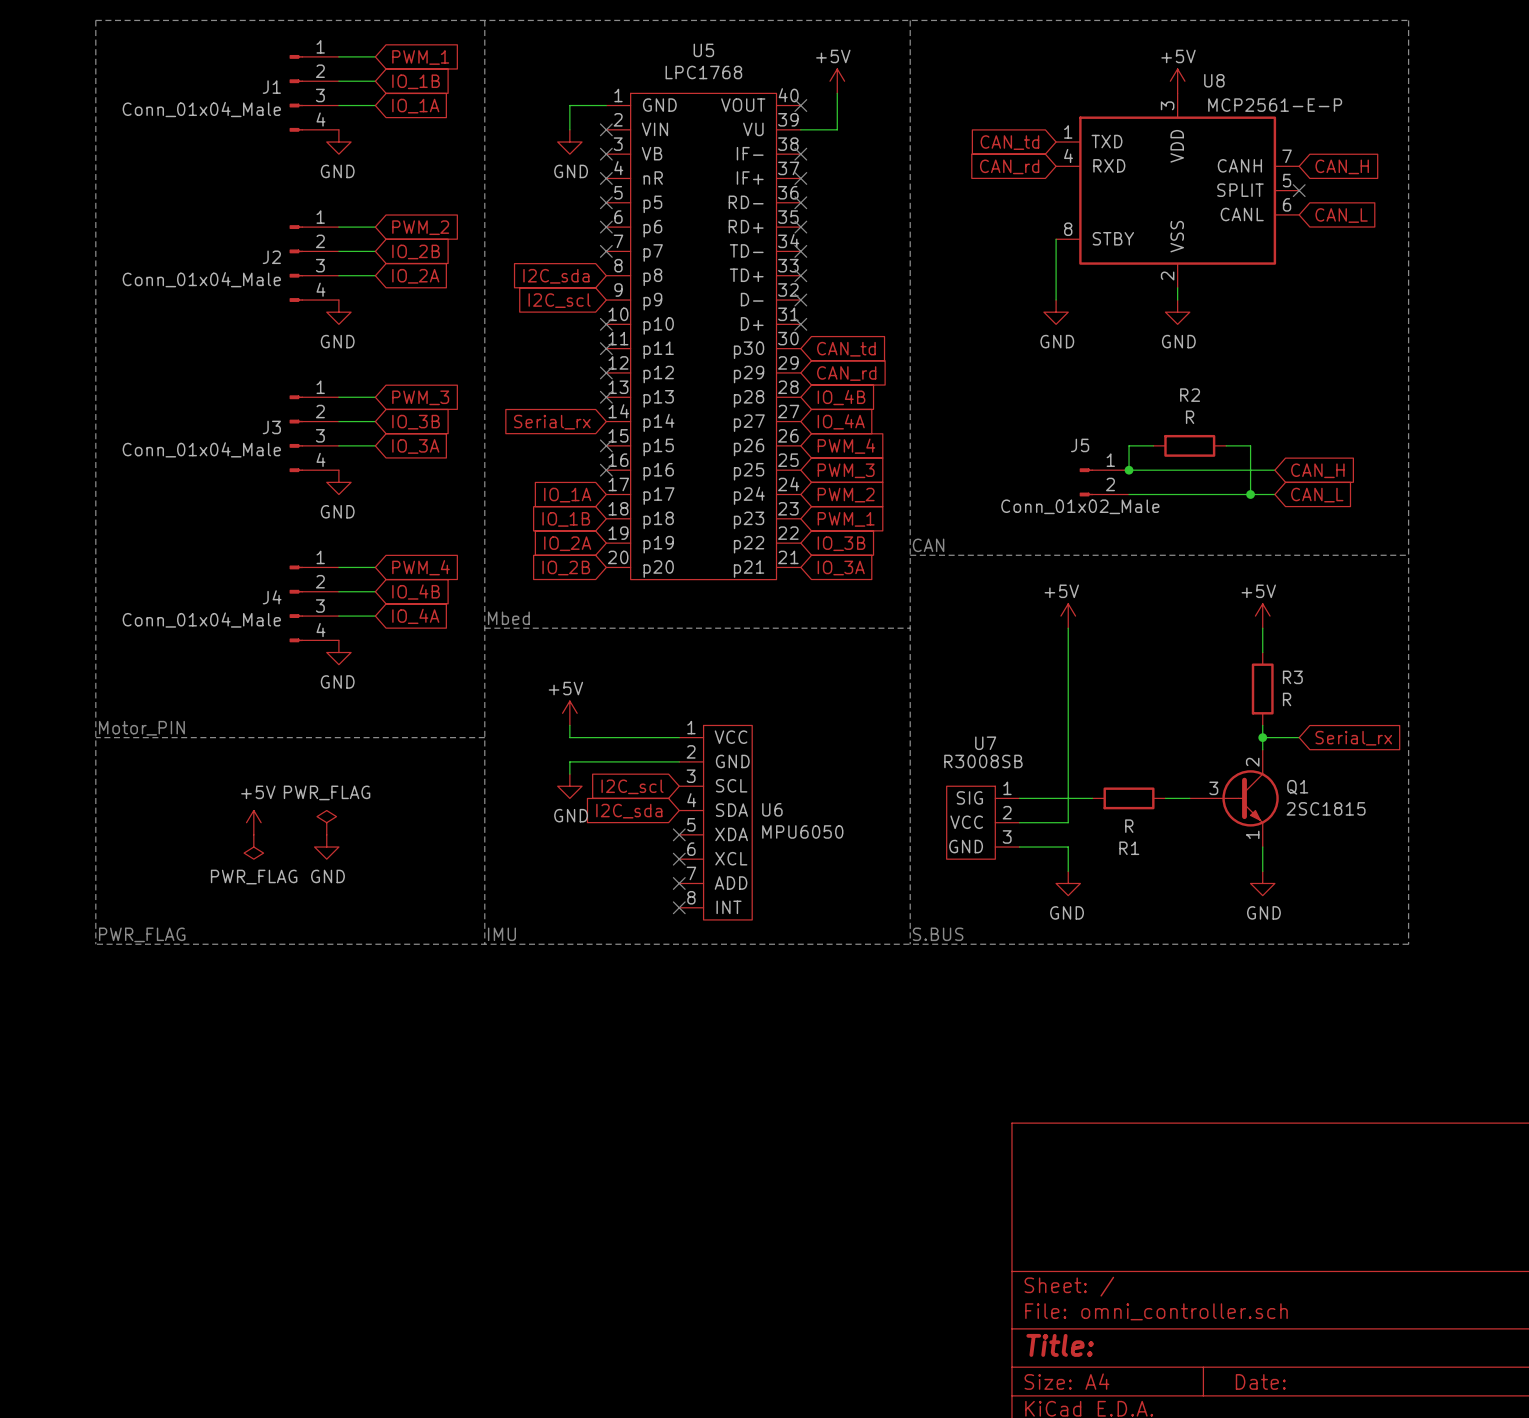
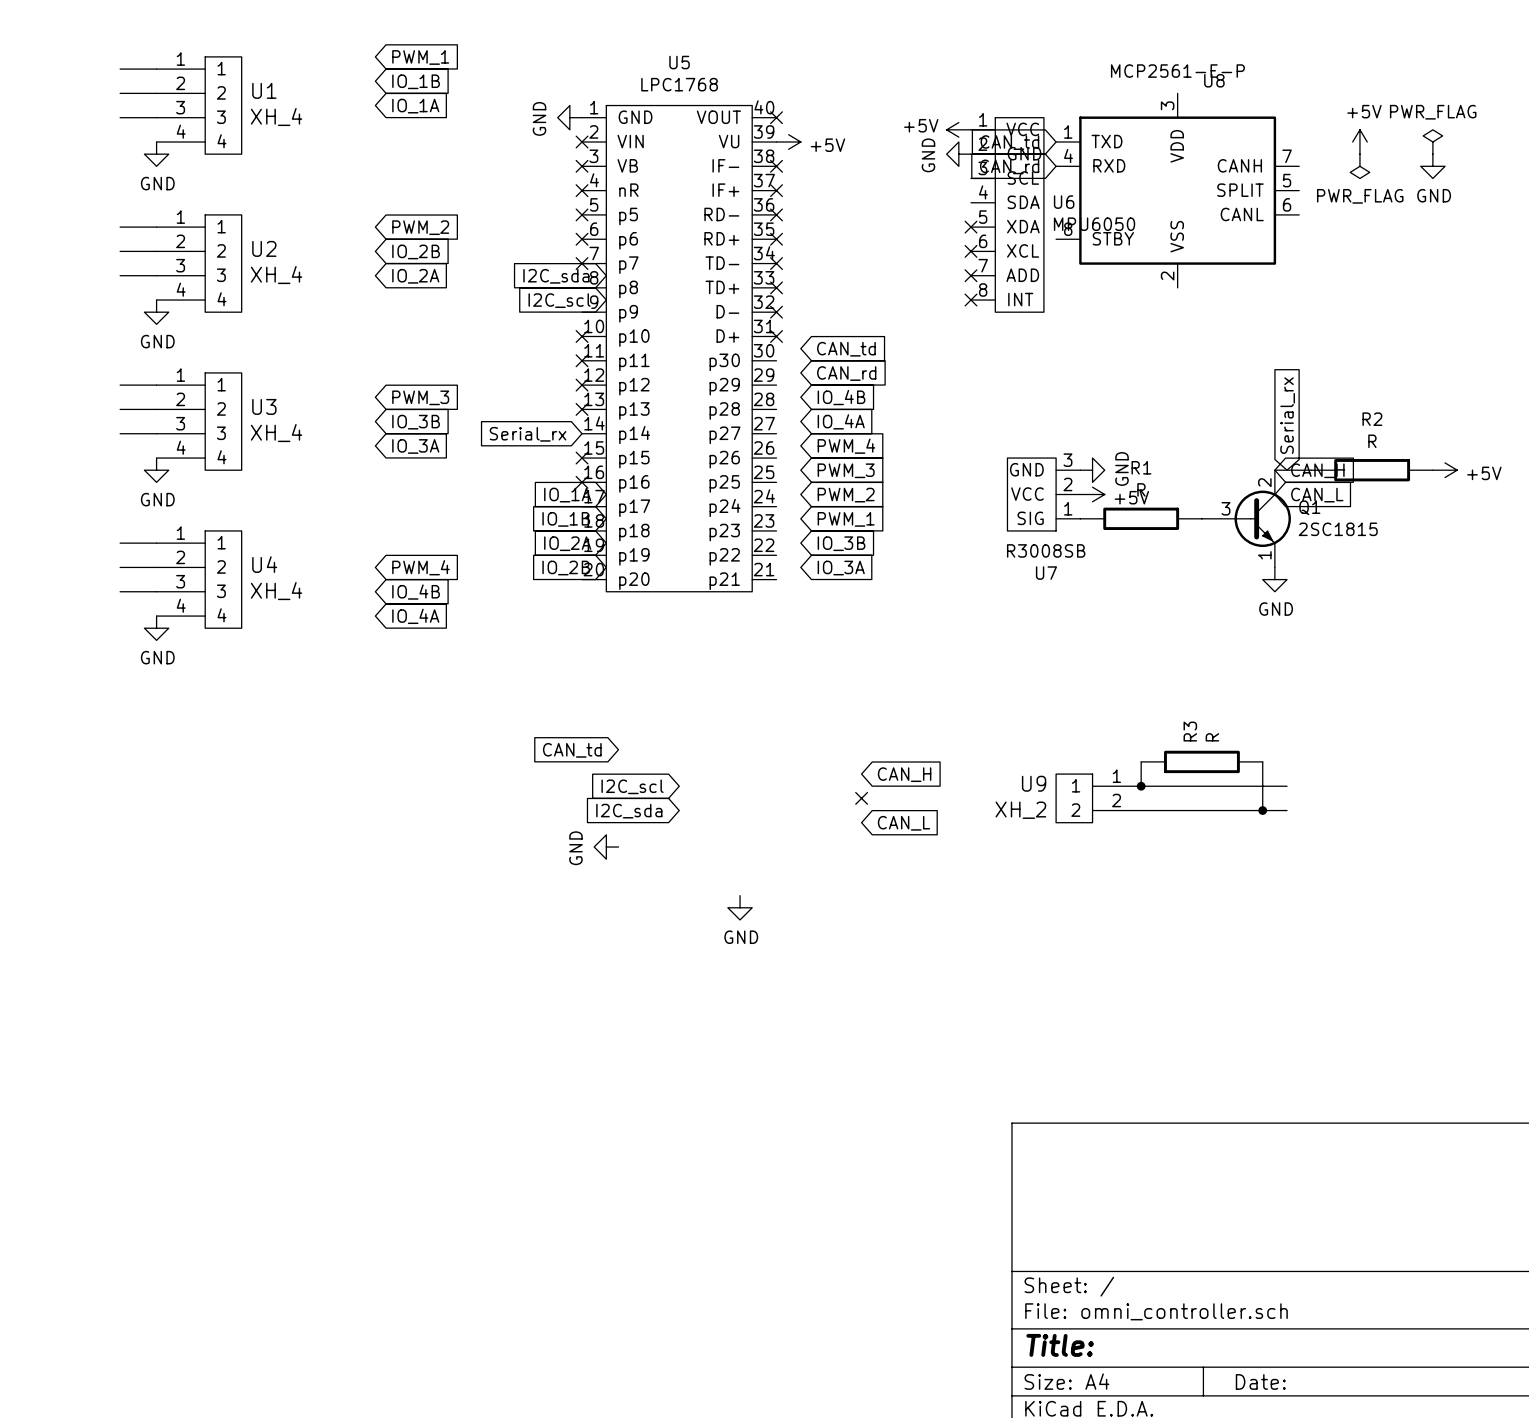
line: (95, 20) (1408, 20) (1408, 944) (95, 944) (95, 20) -> none
line: (484, 20) (484, 944) -> none
line: (910, 20) (910, 944) -> none
wire: (338, 56) (375, 56) -> (120, 69) (156, 69)
wire: (338, 81) (375, 81) -> (120, 93) (156, 93)
power symbol: +5V (837, 81) -> none
power symbol: +5V (1177, 81) -> none
J1: Conn_01x04_Male (314, 93) -> none
wire: (837, 93) (837, 129) (800, 129) -> none
U1: none -> XH_4 (199, 105)
wire: (338, 105) (375, 105) -> (120, 117) (156, 117)
wire: (606, 105) (569, 105) (569, 129) -> none
no-connect mark: (800, 105) -> none
U8 value position: MCP2561-E-P (1275, 105) -> MCP2561-E-P (1177, 71)
no-connect mark: none -> (776, 117)
no-connect mark: (606, 129) -> none
power symbol: none -> +5V (958, 129)
power symbol: GND (338, 142) -> none
power symbol rotation: 0° (569, 142) -> 90° clockwise (569, 117)
power symbol position: GND (569, 142) -> GND (569, 117)
no-connect mark: none -> (582, 142)
power symbol: none -> +5V (788, 142)
power symbol: none -> +5V (1359, 142)
power symbol: none -> PWR_FLAG (1432, 142)
power symbol: none -> GND (156, 154)
no-connect mark: (606, 154) -> none
no-connect mark: (800, 154) -> none
power symbol: none -> GND (958, 154)
no-connect mark: none -> (582, 166)
no-connect mark: none -> (776, 166)
global label: CAN_H (1342, 166) -> none
power symbol: none -> PWR_FLAG (1359, 166)
power symbol: none -> GND (1432, 166)
no-connect mark: (606, 178) -> none
no-connect mark: (800, 178) -> none
no-connect mark: none -> (582, 190)
no-connect mark: none -> (776, 190)
no-connect mark: (1299, 190) -> none
no-connect mark: (606, 202) -> none
no-connect mark: (800, 202) -> none
no-connect mark: none -> (582, 214)
no-connect mark: none -> (776, 214)
global label: CAN_L (1341, 215) -> none
wire: (338, 227) (375, 227) -> (120, 227) (156, 227)
no-connect mark: (606, 227) -> none
no-connect mark: (800, 227) -> none
no-connect mark: none -> (971, 227)
no-connect mark: none -> (582, 239)
no-connect mark: none -> (776, 239)
wire: (1056, 239) (1056, 300) -> none
wire: (338, 251) (375, 251) -> (120, 251) (156, 251)
no-connect mark: (606, 251) -> none
no-connect mark: (800, 251) -> none
no-connect mark: none -> (971, 251)
U2: none -> XH_4 (199, 263)
J2: Conn_01x04_Male (314, 263) -> none
no-connect mark: none -> (582, 263)
no-connect mark: none -> (776, 263)
wire: (338, 275) (375, 275) -> (120, 275) (156, 275)
no-connect mark: (800, 275) -> none
no-connect mark: none -> (971, 275)
no-connect mark: none -> (776, 287)
wire: (1177, 287) (1177, 300) -> none
no-connect mark: (800, 300) -> none
no-connect mark: none -> (971, 300)
power symbol: none -> GND (156, 312)
power symbol: GND (338, 312) -> none
no-connect mark: none -> (776, 312)
power symbol: GND (1056, 312) -> none
power symbol: GND (1177, 312) -> none
no-connect mark: (606, 324) -> none
no-connect mark: (800, 324) -> none
no-connect mark: none -> (582, 336)
U5 position: (703, 336) -> (679, 348)
no-connect mark: none -> (776, 336)
no-connect mark: (606, 348) -> none
no-connect mark: none -> (582, 360)
no-connect mark: (606, 372) -> none
no-connect mark: none -> (582, 385)
wire: (338, 397) (375, 397) -> (120, 385) (156, 385)
no-connect mark: (606, 397) -> none
no-connect mark: none -> (582, 409)
global label: none -> Serial_rx (1287, 415)
U3: none -> XH_4 (199, 421)
wire: (338, 421) (375, 421) -> (120, 409) (156, 409)
global label position: Serial_rx (552, 422) -> Serial_rx (528, 434)
J3: Conn_01x04_Male (314, 433) -> none
R2 symbol: [1153, 434, 1227, 457] -> [1311, 459, 1433, 482]
wire: (338, 445) (375, 445) -> (120, 433) (156, 433)
no-connect mark: (606, 445) -> none
wire: (1153, 445) (1129, 445) (1129, 470) (1274, 470) -> (1311, 470) (1274, 470)
wire: (1226, 445) (1250, 445) (1250, 494) -> none
no-connect mark: none -> (582, 458)
power symbol: none -> GND (156, 470)
no-connect mark: (606, 470) -> none
power symbol: none -> GND (1092, 470)
junction: (1129, 470) -> none
power symbol: none -> +5V (1445, 470)
power symbol: GND (338, 482) -> none
no-connect mark: none -> (582, 482)
J5: Conn_01x02_Male (1104, 482) -> none
power symbol: none -> +5V (1092, 494)
wire: (1129, 494) (1274, 494) -> none
junction: (1250, 494) -> none
text: CAN (928, 545) -> none
line: (910, 555) (1408, 555) -> none
wire: (338, 567) (375, 567) -> (120, 567) (156, 567)
U4: none -> XH_4 (199, 579)
power symbol: none -> GND (1274, 579)
wire: (338, 591) (375, 591) -> (120, 591) (156, 591)
J4: Conn_01x04_Male (314, 603) -> none
wire: (338, 616) (375, 616) -> (120, 543) (156, 543)
power symbol: +5V (1068, 616) -> none
power symbol: +5V (1262, 616) -> none
text: Mbed (508, 618) -> none
power symbol: none -> GND (156, 628)
line: (484, 628) (910, 628) -> none
wire: (1068, 628) (1068, 822) (1019, 822) -> none
wire: (1262, 628) (1262, 652) -> none
power symbol: GND (338, 652) -> none
R3 symbol: [1251, 652, 1274, 726] -> [1141, 750, 1263, 774]
R3 name position: R3 (1292, 677) -> R3 (1190, 731)
R3 value position: R (1287, 699) -> R (1212, 737)
power symbol: +5V (569, 713) -> none
wire: (569, 725) (569, 737) (679, 737) -> none
wire: (1262, 725) (1262, 749) -> none
text: Motor_PIN (141, 728) -> none
line: (95, 737) (484, 737) -> none
wire: (1262, 737) (1299, 737) -> none
junction: (1262, 737) -> none
global label: Serial_rx (1353, 738) -> none
global label: none -> CAN_td (572, 750)
wire: (679, 761) (569, 761) (569, 774) -> none
wire: none -> (1141, 761) (1141, 786) (1287, 786)
wire: none -> (1262, 761) (1262, 810)
global label: none -> CAN_H (904, 774)
power symbol rotation: 0° (569, 786) -> 90° clockwise (606, 847)
power symbol position: GND (569, 786) -> GND (606, 847)
junction: none -> (1141, 786)
R1 symbol: [1092, 787, 1166, 810] -> [1080, 507, 1202, 531]
no-connect mark: none -> (861, 798)
wire: (1019, 798) (1092, 798) -> none
U9: none -> XH_2 (1098, 798)
wire: (1165, 798) (1189, 798) -> none
Q1 position: (1234, 798) -> (1246, 518)
wire: none -> (1141, 810) (1287, 810)
junction: none -> (1262, 810)
power symbol: +5V (253, 822) -> none
power symbol: PWR_FLAG (326, 822) -> none
U6 position: (715, 822) -> (1007, 214)
U7 flip: as is (971, 822) -> up-down (1031, 494)
U7 position: (983, 822) -> (1043, 494)
global label: none -> CAN_L (904, 823)
R1 value position: R (1129, 826) -> R (1141, 489)
no-connect mark: (679, 834) -> none
power symbol: PWR_FLAG (253, 847) -> none
power symbol: GND (326, 847) -> none
wire: (1019, 847) (1068, 847) (1068, 871) -> none
wire: (1262, 847) (1262, 871) -> none
R1 name position: R1 (1129, 848) -> R1 (1141, 467)
no-connect mark: (679, 859) -> none
no-connect mark: (679, 883) -> none
power symbol: GND (1068, 883) -> none
power symbol: GND (1262, 883) -> none
no-connect mark: (679, 907) -> none
power symbol: none -> GND (740, 907)
text: PWR_FLAG (142, 934) -> none
text: IMU (501, 934) -> none
text: S.BUS (938, 934) -> none

